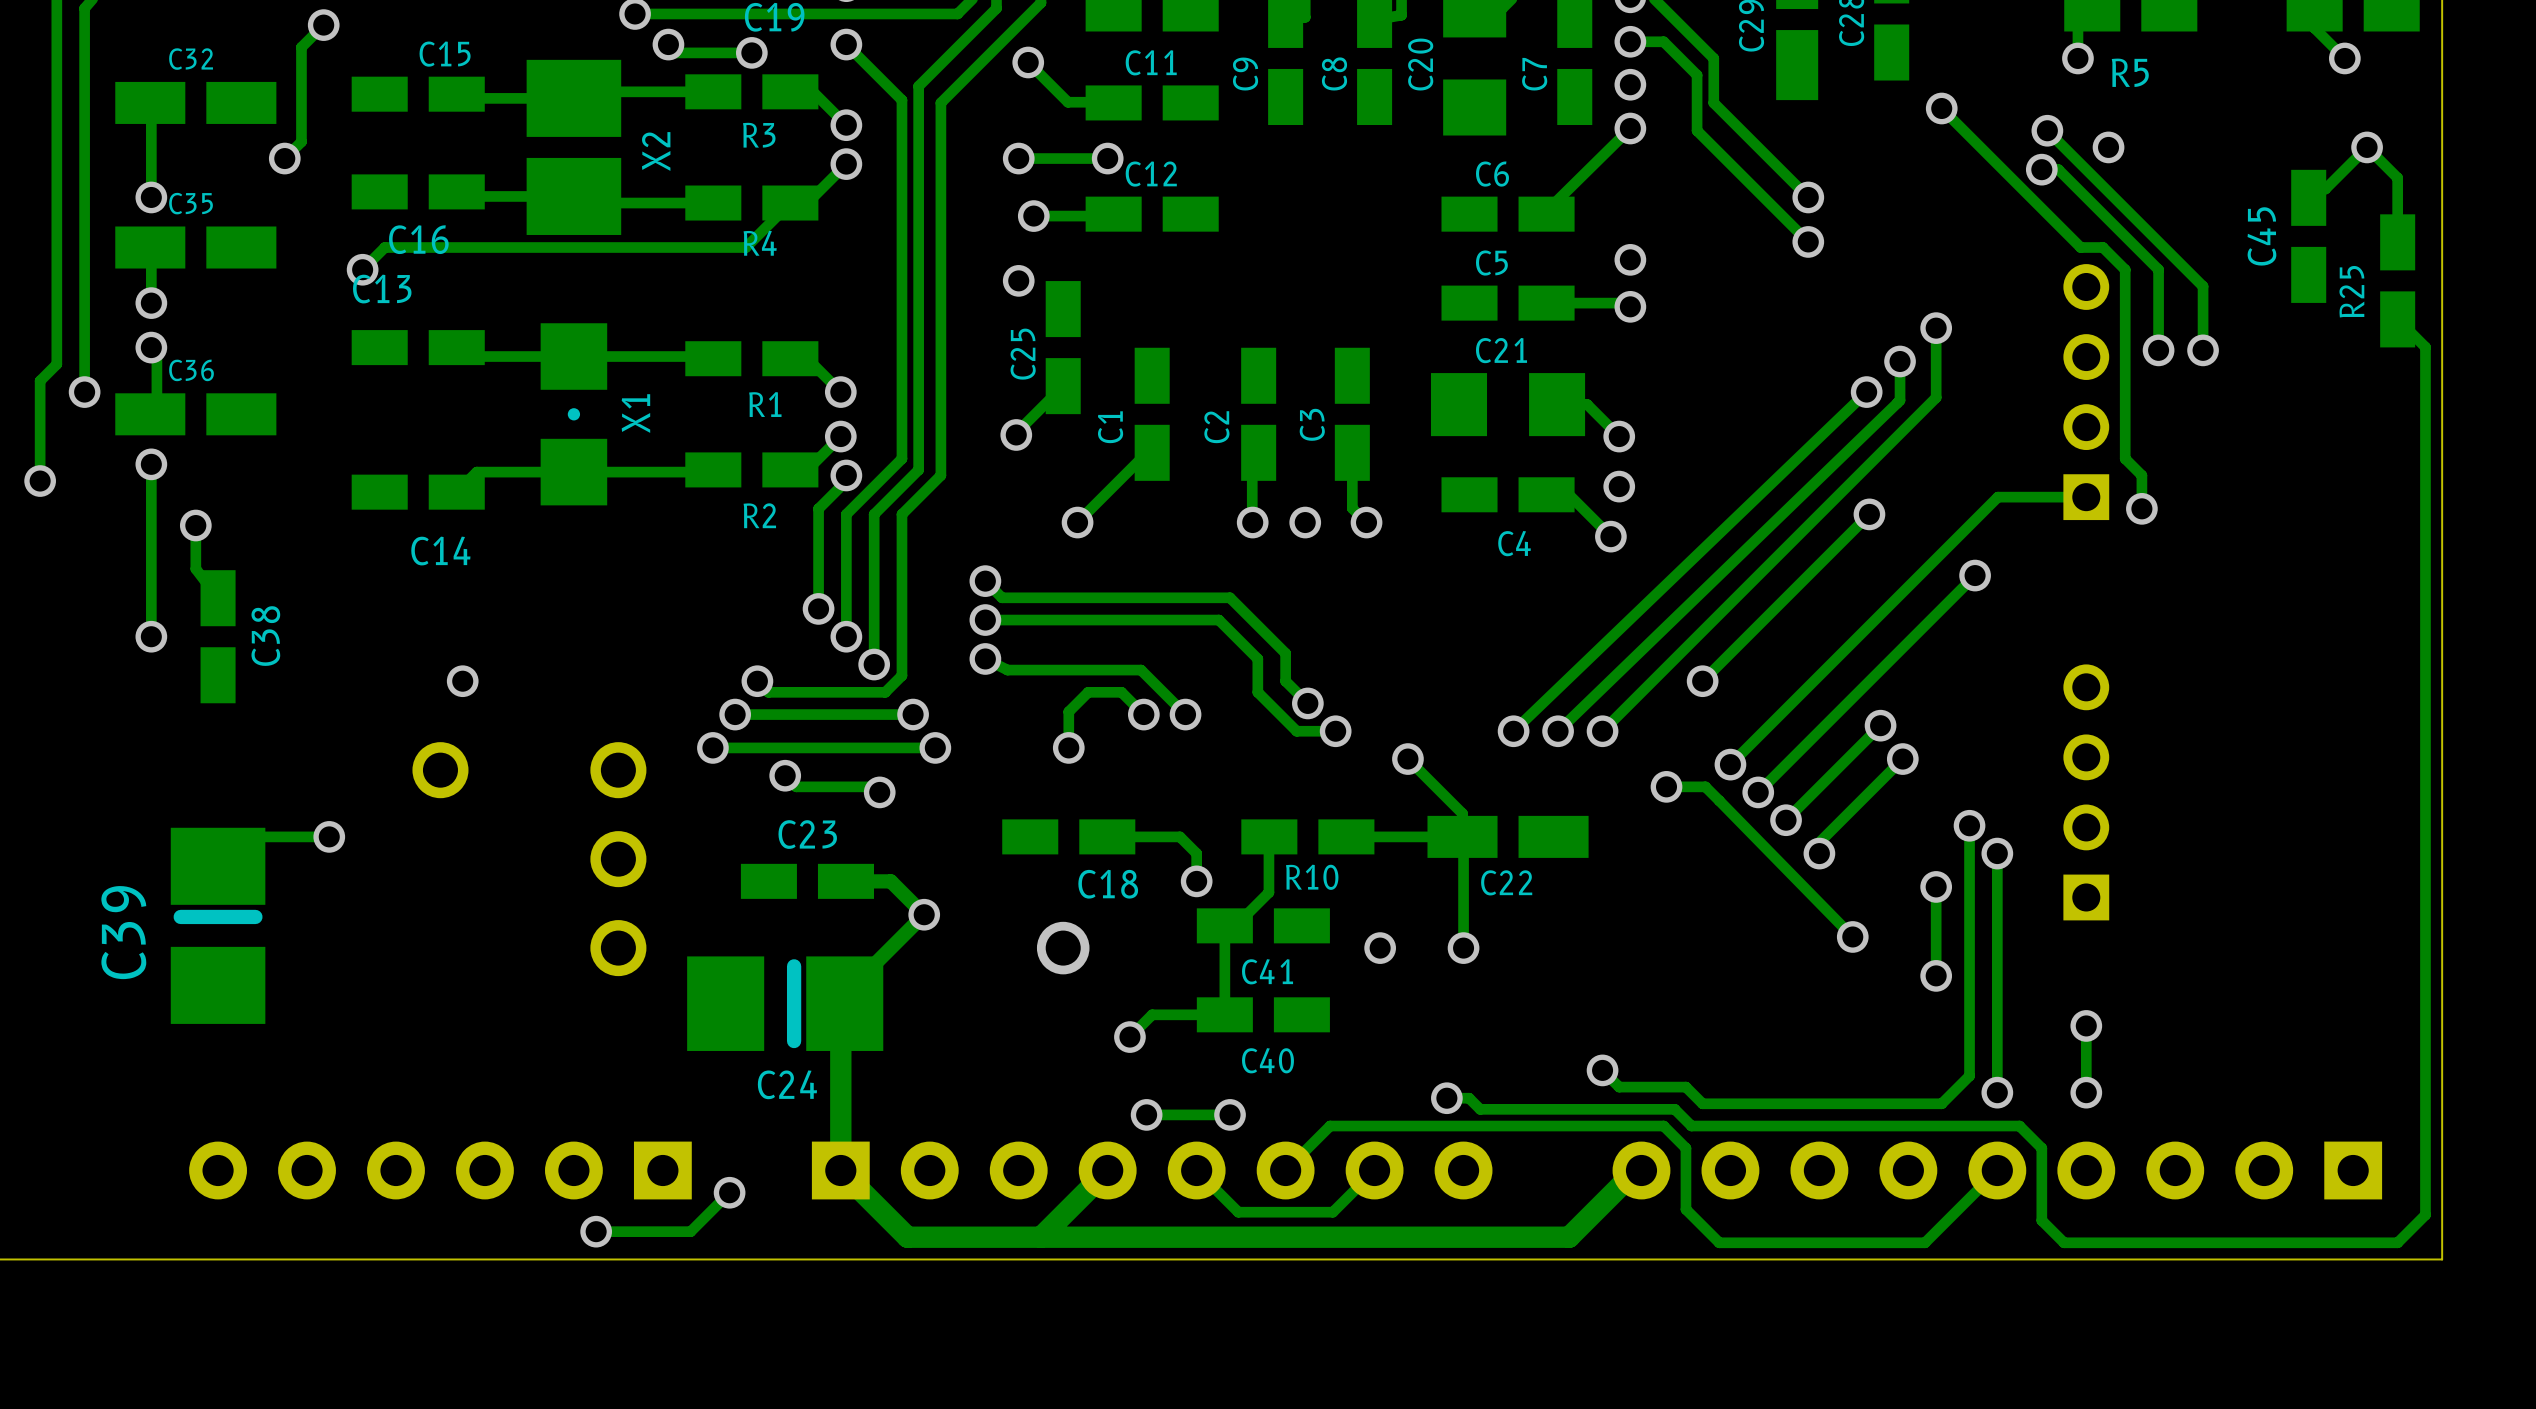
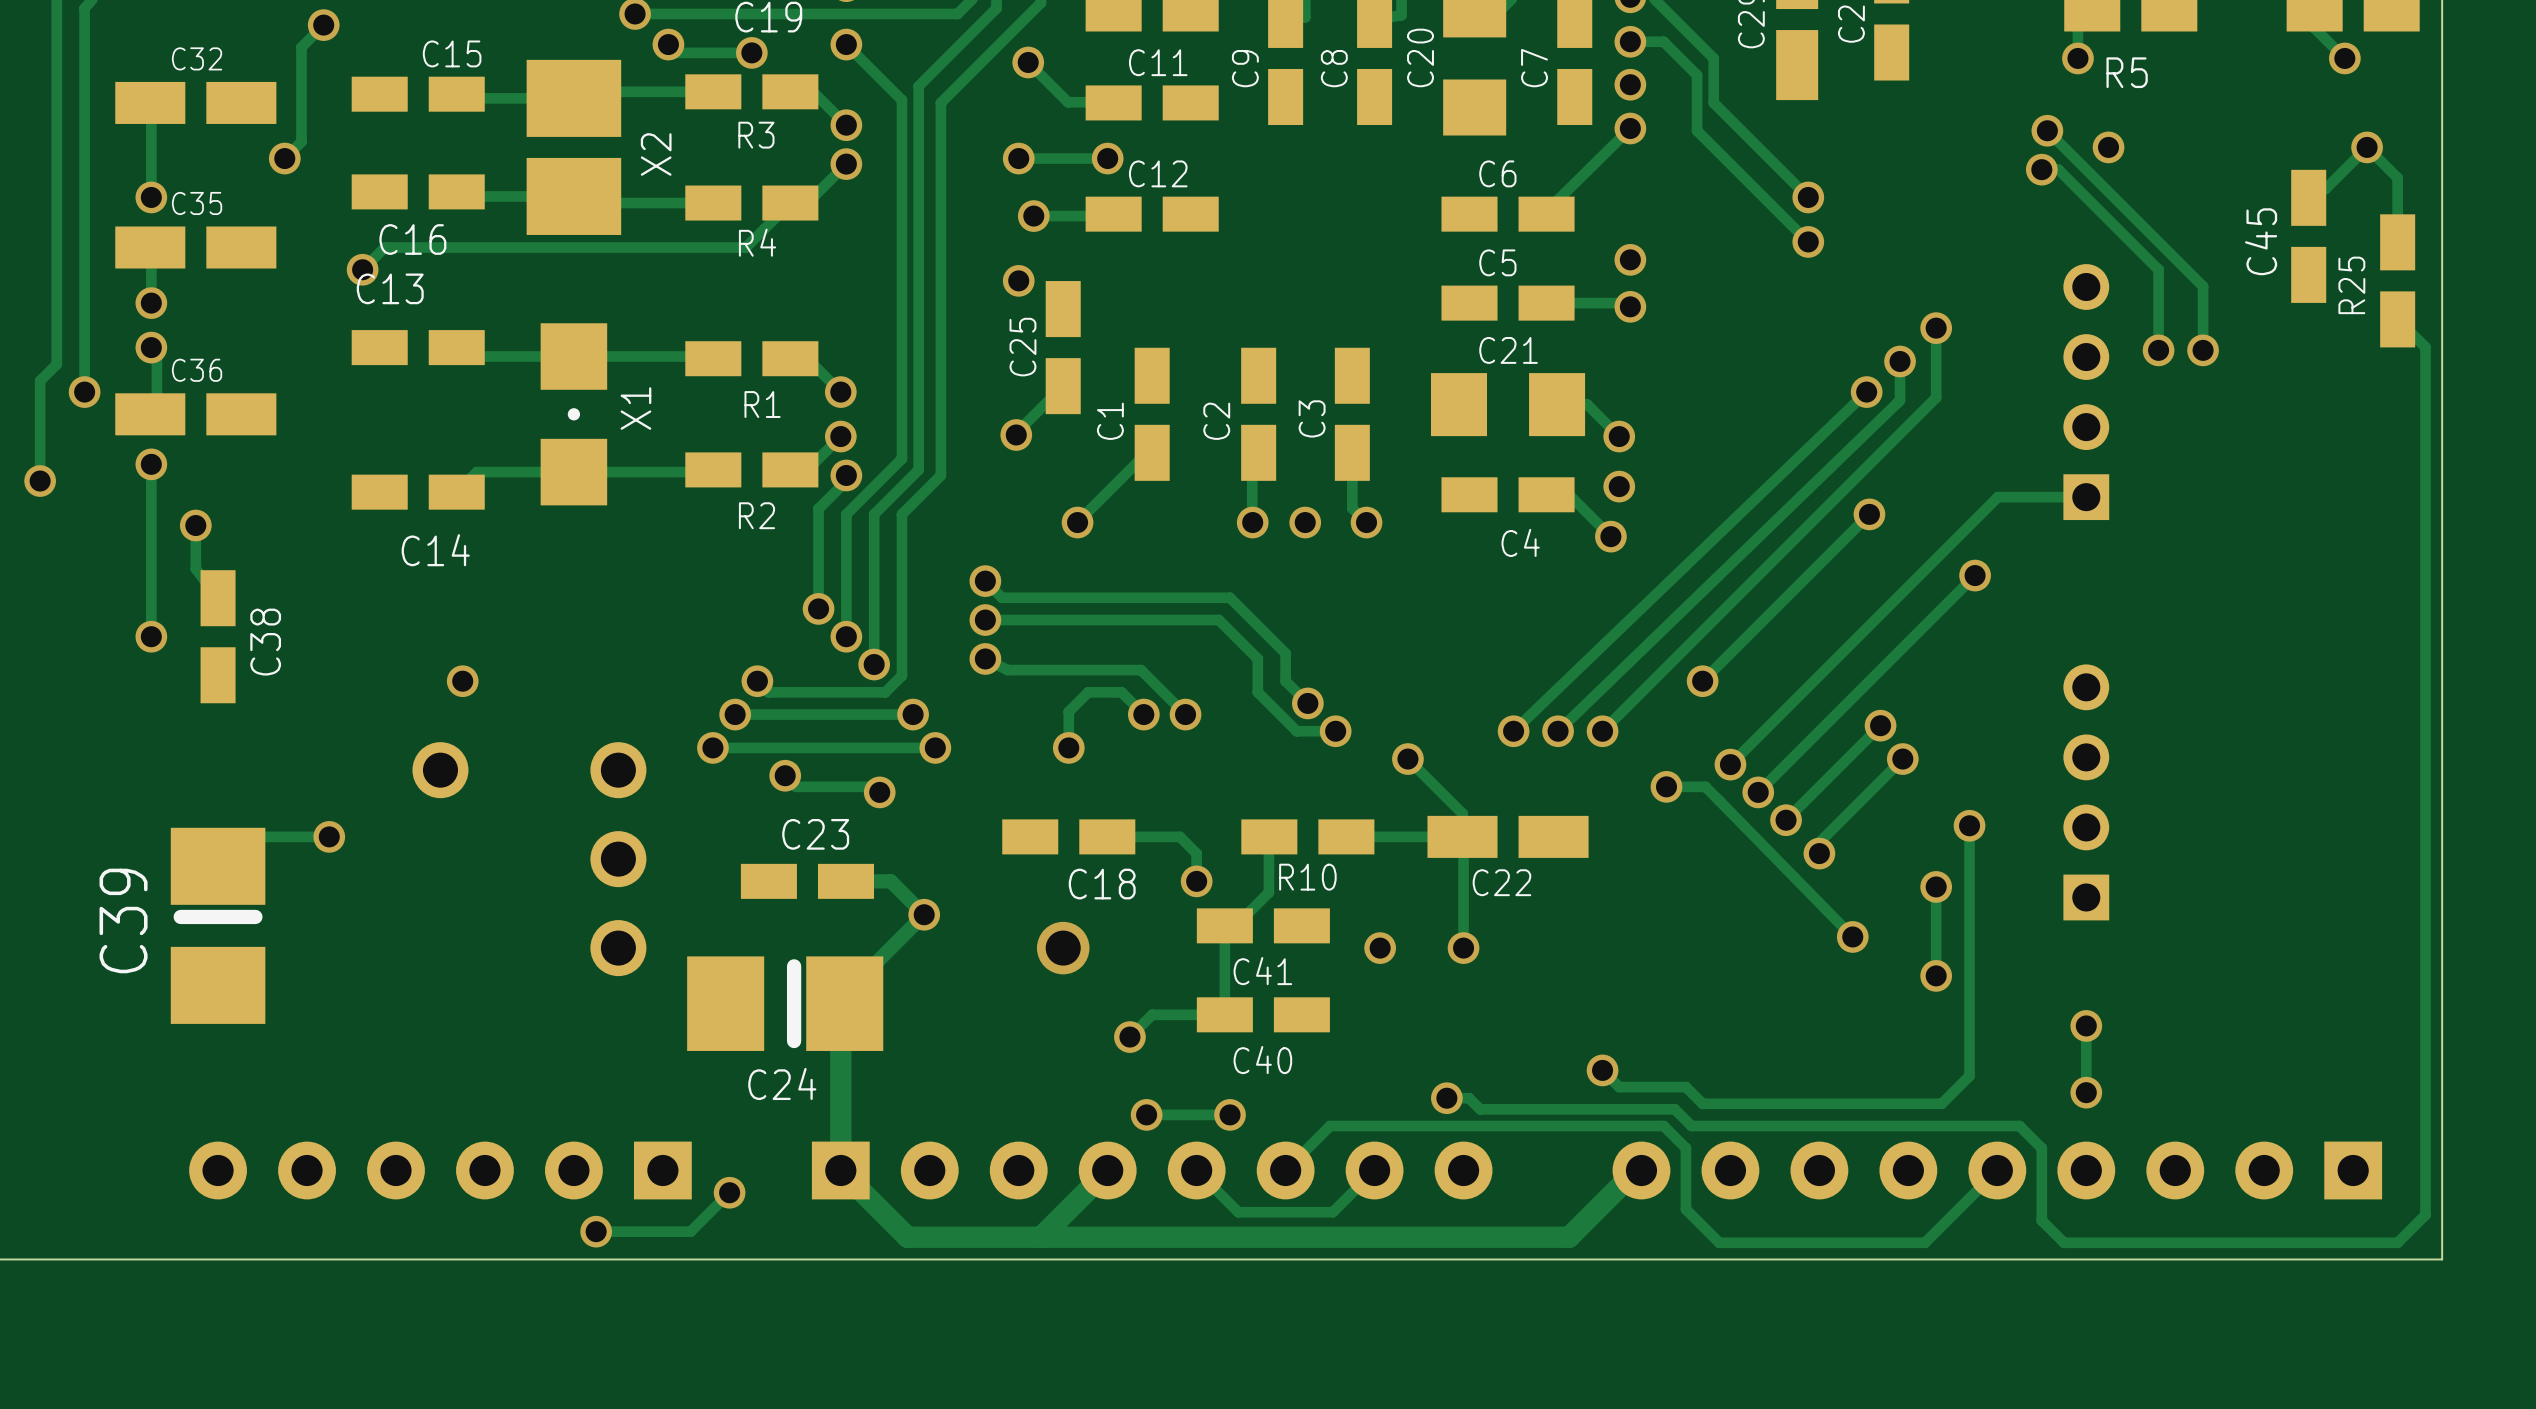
track: (1941, 108) (2080, 247) (2102, 247) (2125, 269) (2125, 458) (2141, 475) (2141, 508) -> none
via: (1941, 108) -> none
via: (2141, 508) -> none
track: (1997, 853) (1997, 1092) -> none
via: (1997, 853) -> none
via: (1997, 1092) -> none

